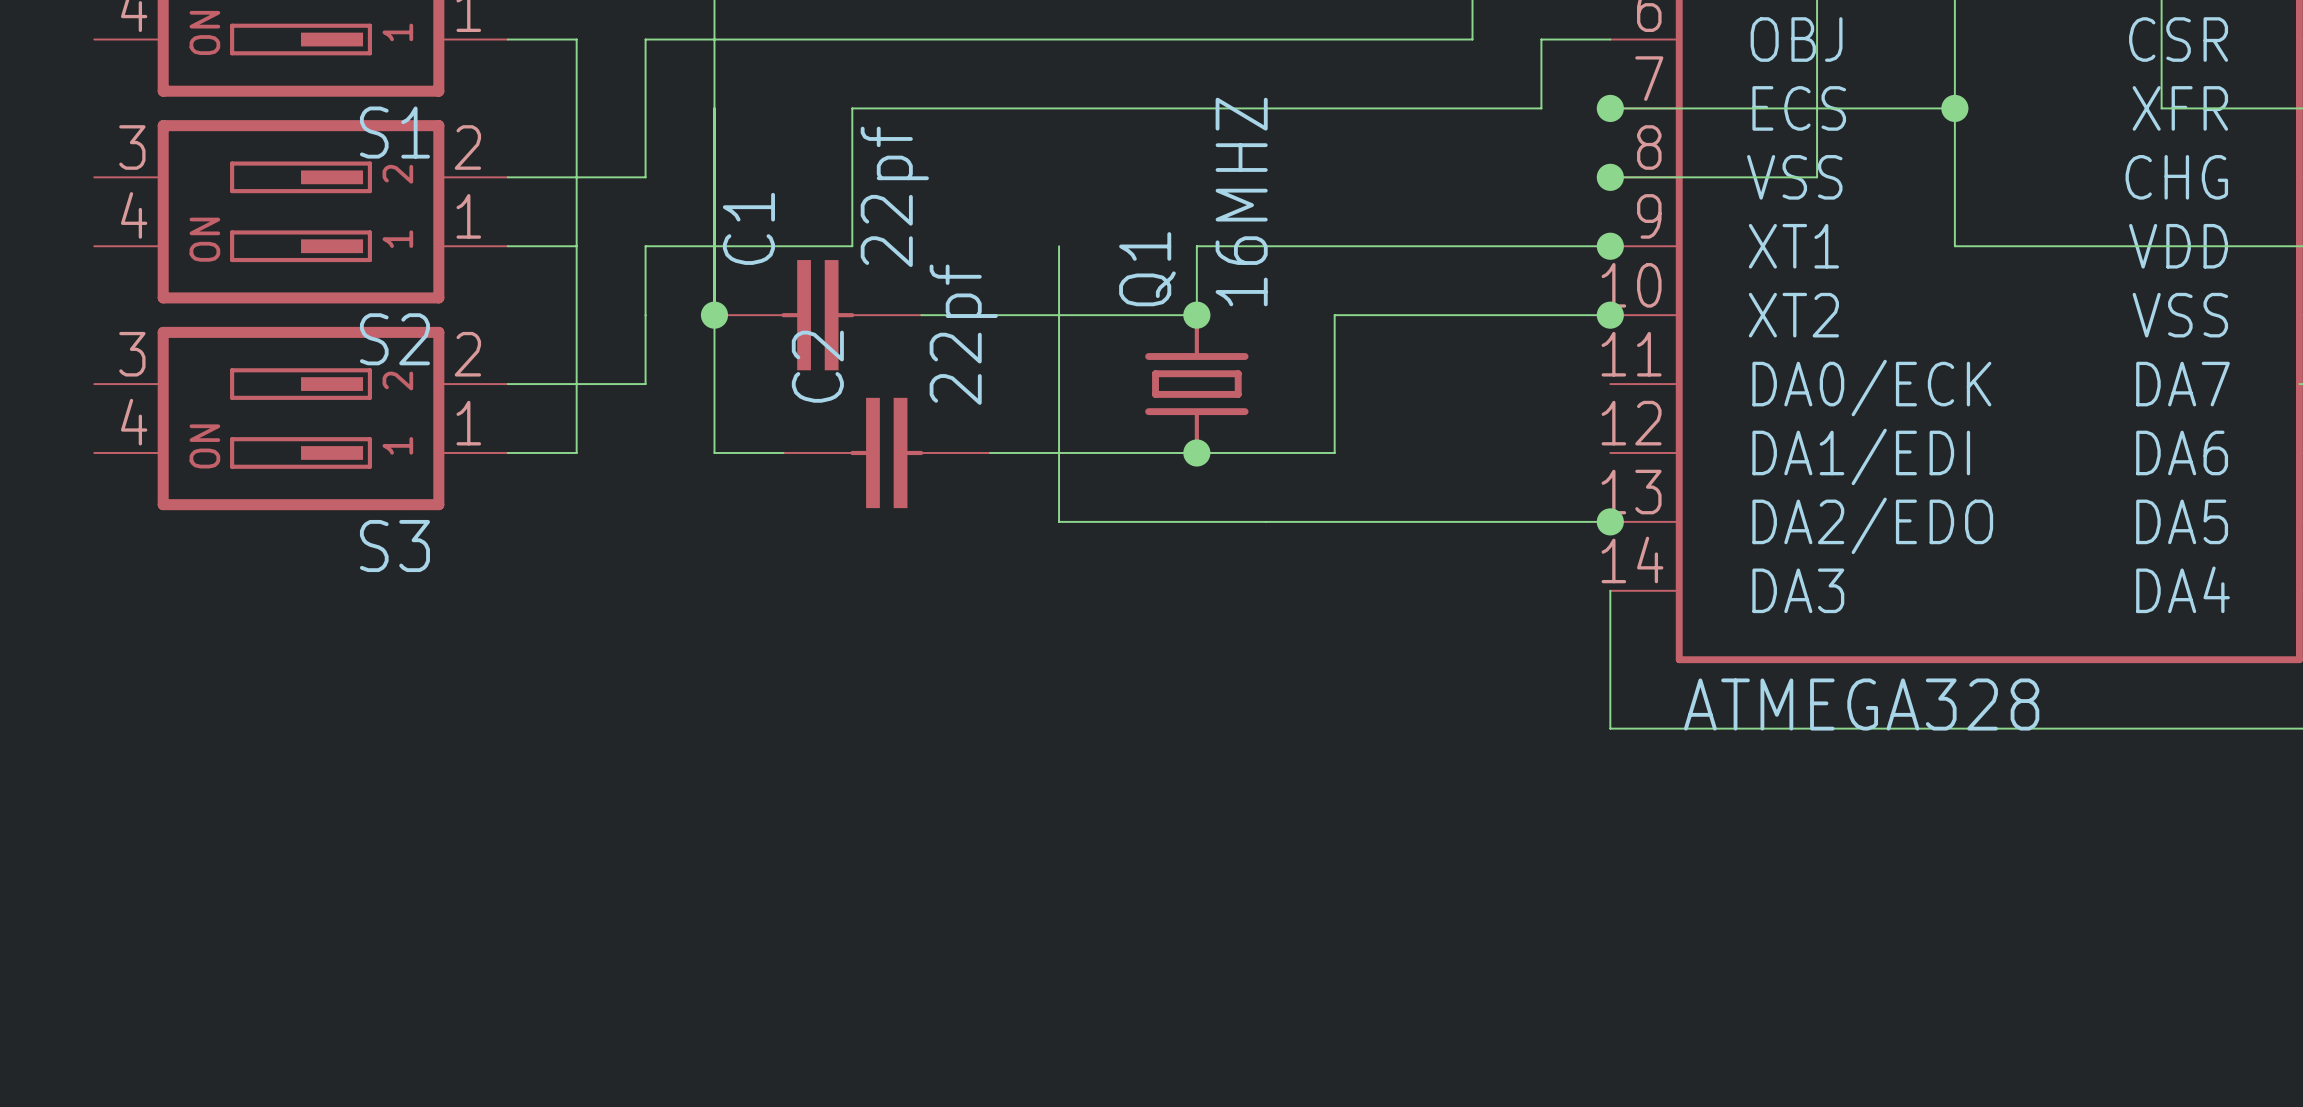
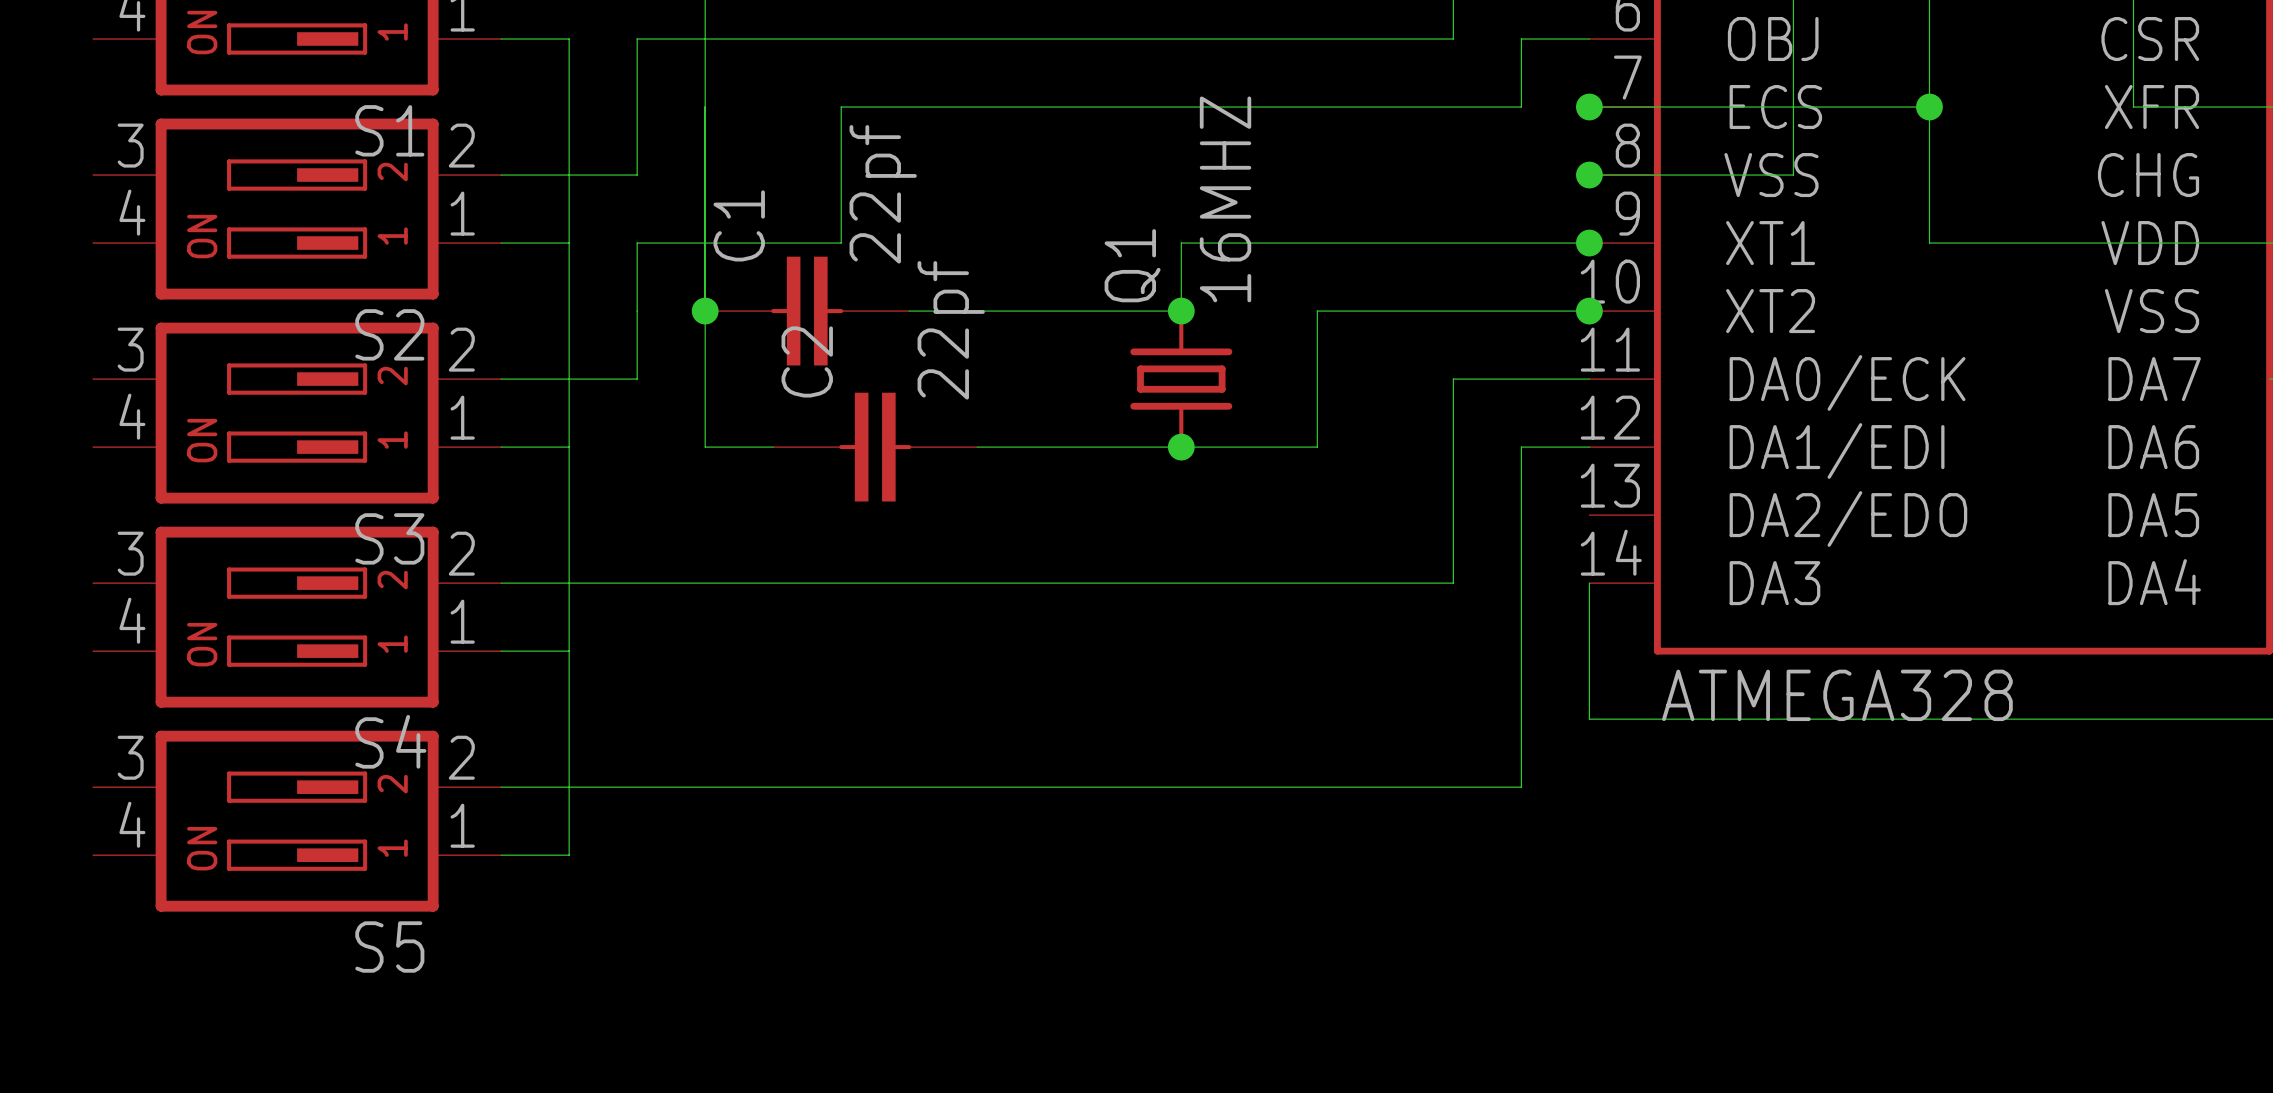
wire: (1059, 246) (1059, 521) (1610, 521) -> none
wire: none -> (1589, 379) (1453, 379) (1453, 583) (501, 583)
wire: none -> (569, 447) (569, 855) (501, 855)
wire: none -> (1589, 447) (1521, 447) (1521, 787) (501, 787)
junction: (1610, 521) -> none
S4: none -> (297, 617)
wire: none -> (501, 651) (569, 651)
S5: none -> (297, 821)

